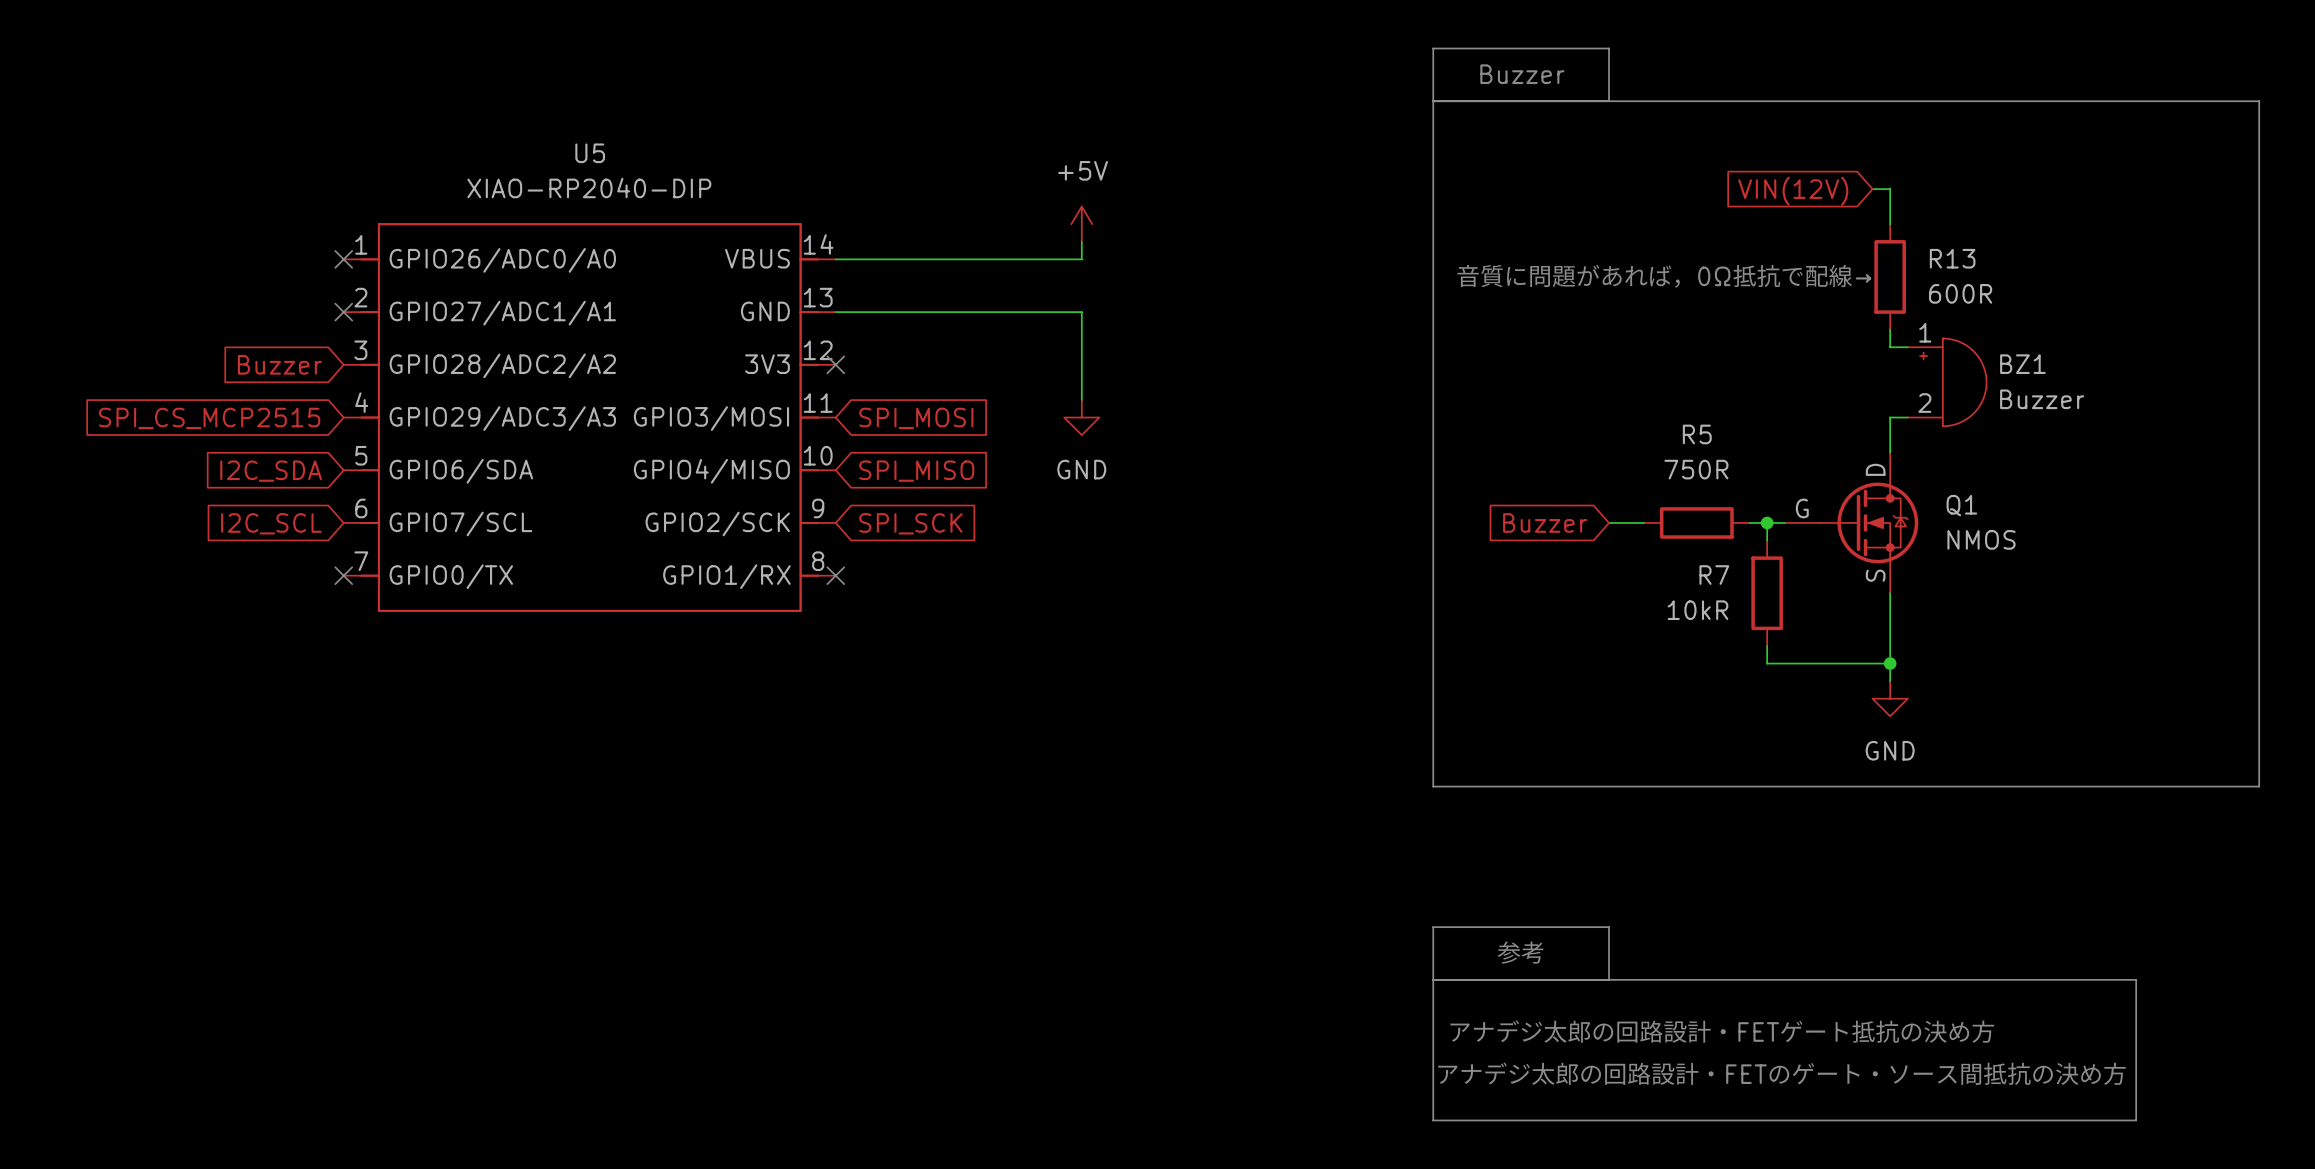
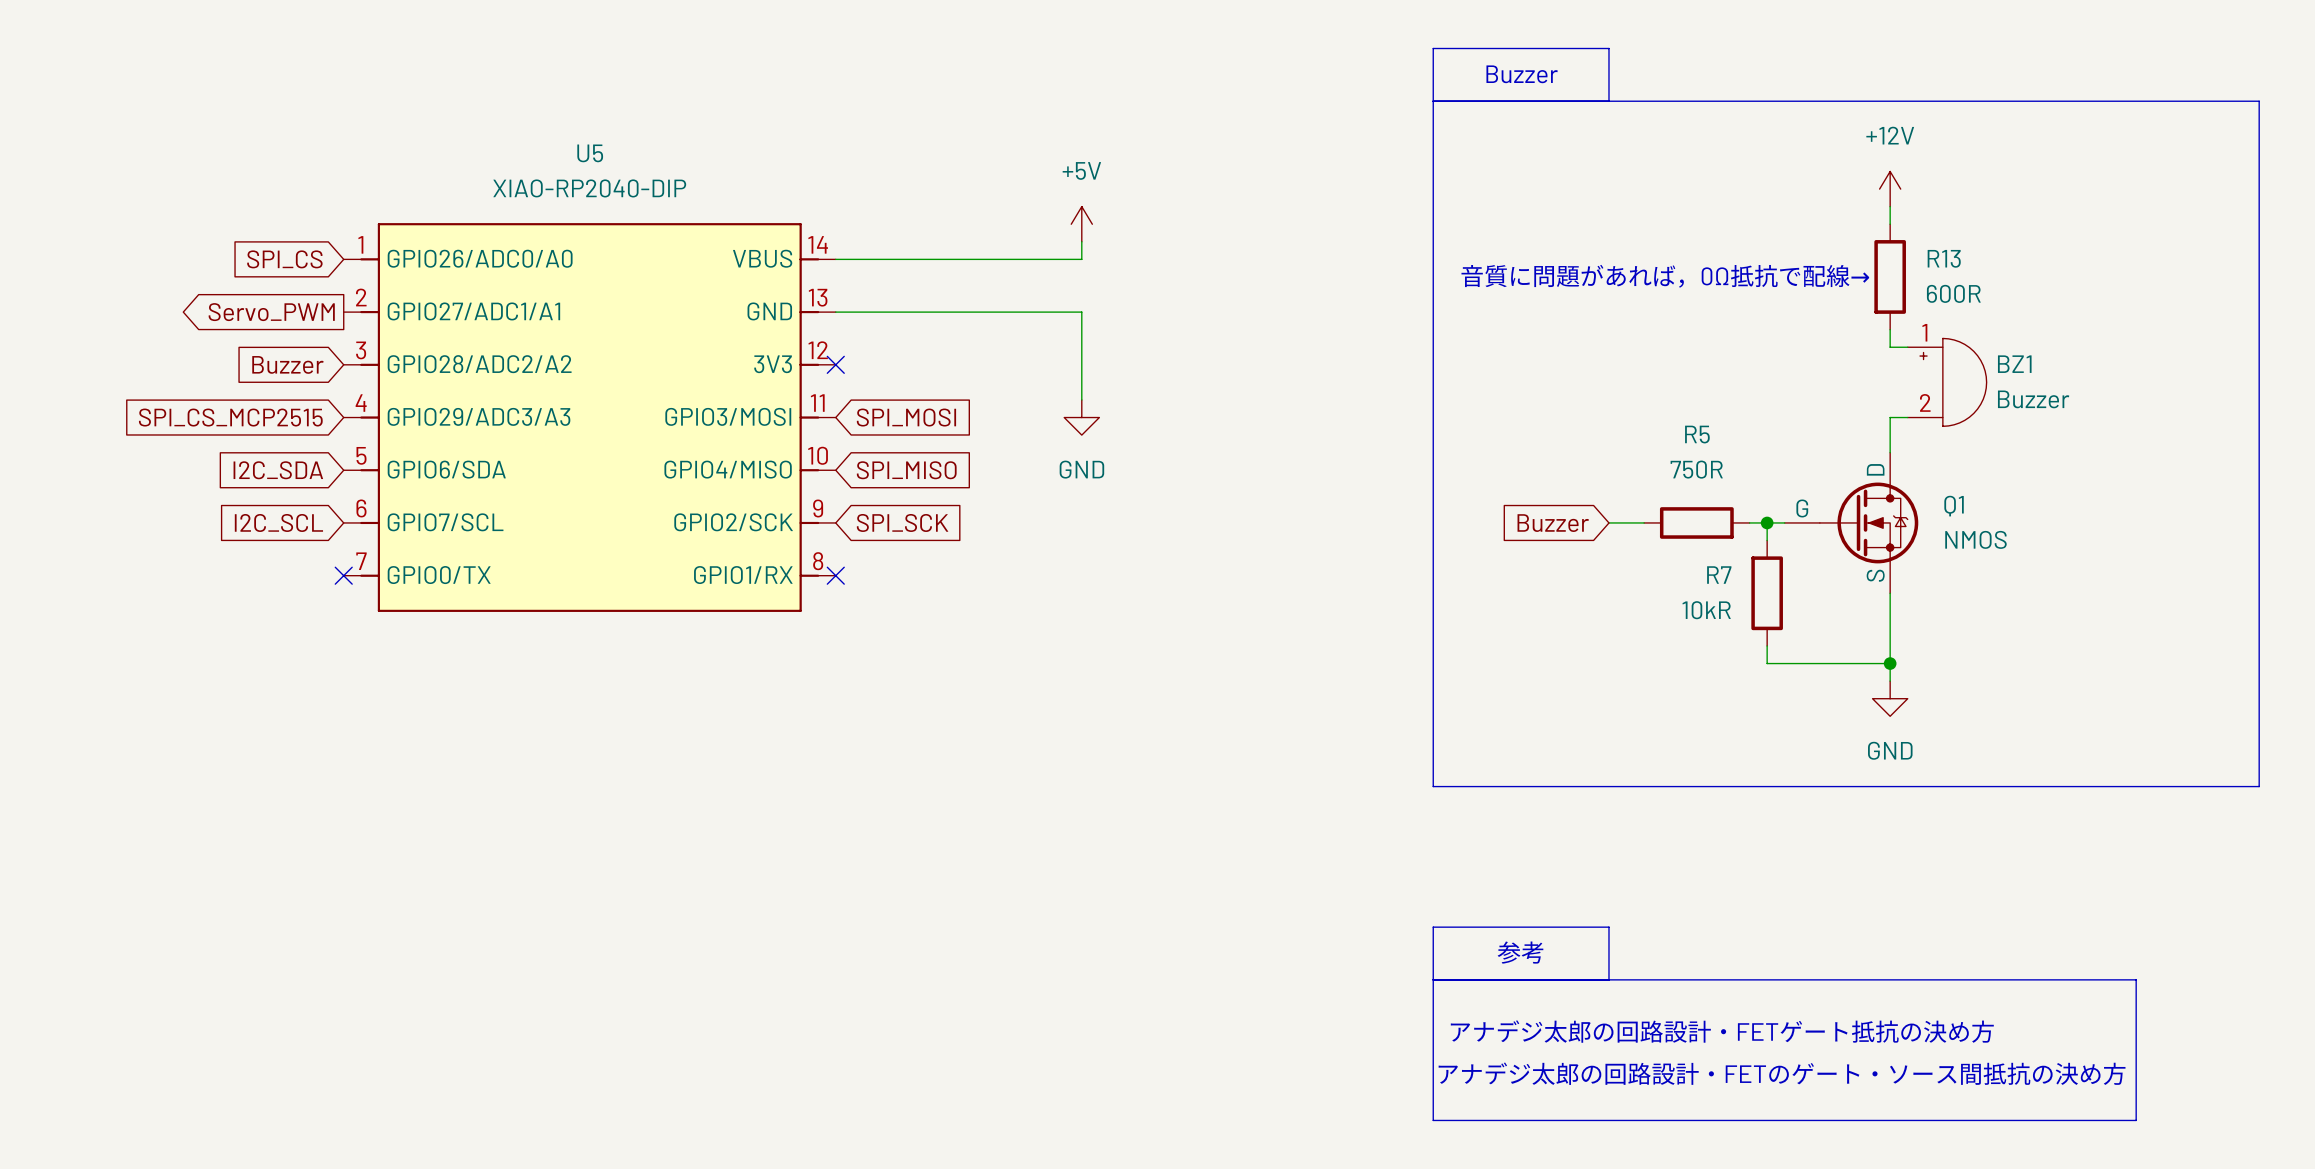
wire: (1872, 189) (1890, 189) (1890, 206) -> none
power symbol: none -> +12V (1890, 189)
global label: VIN(12V) (1793, 191) -> none
no-connect mark: (343, 259) -> none
global label: none -> SPI_CS (284, 259)
global label: none -> Servo_PWM (271, 312)
no-connect mark: (343, 312) -> none

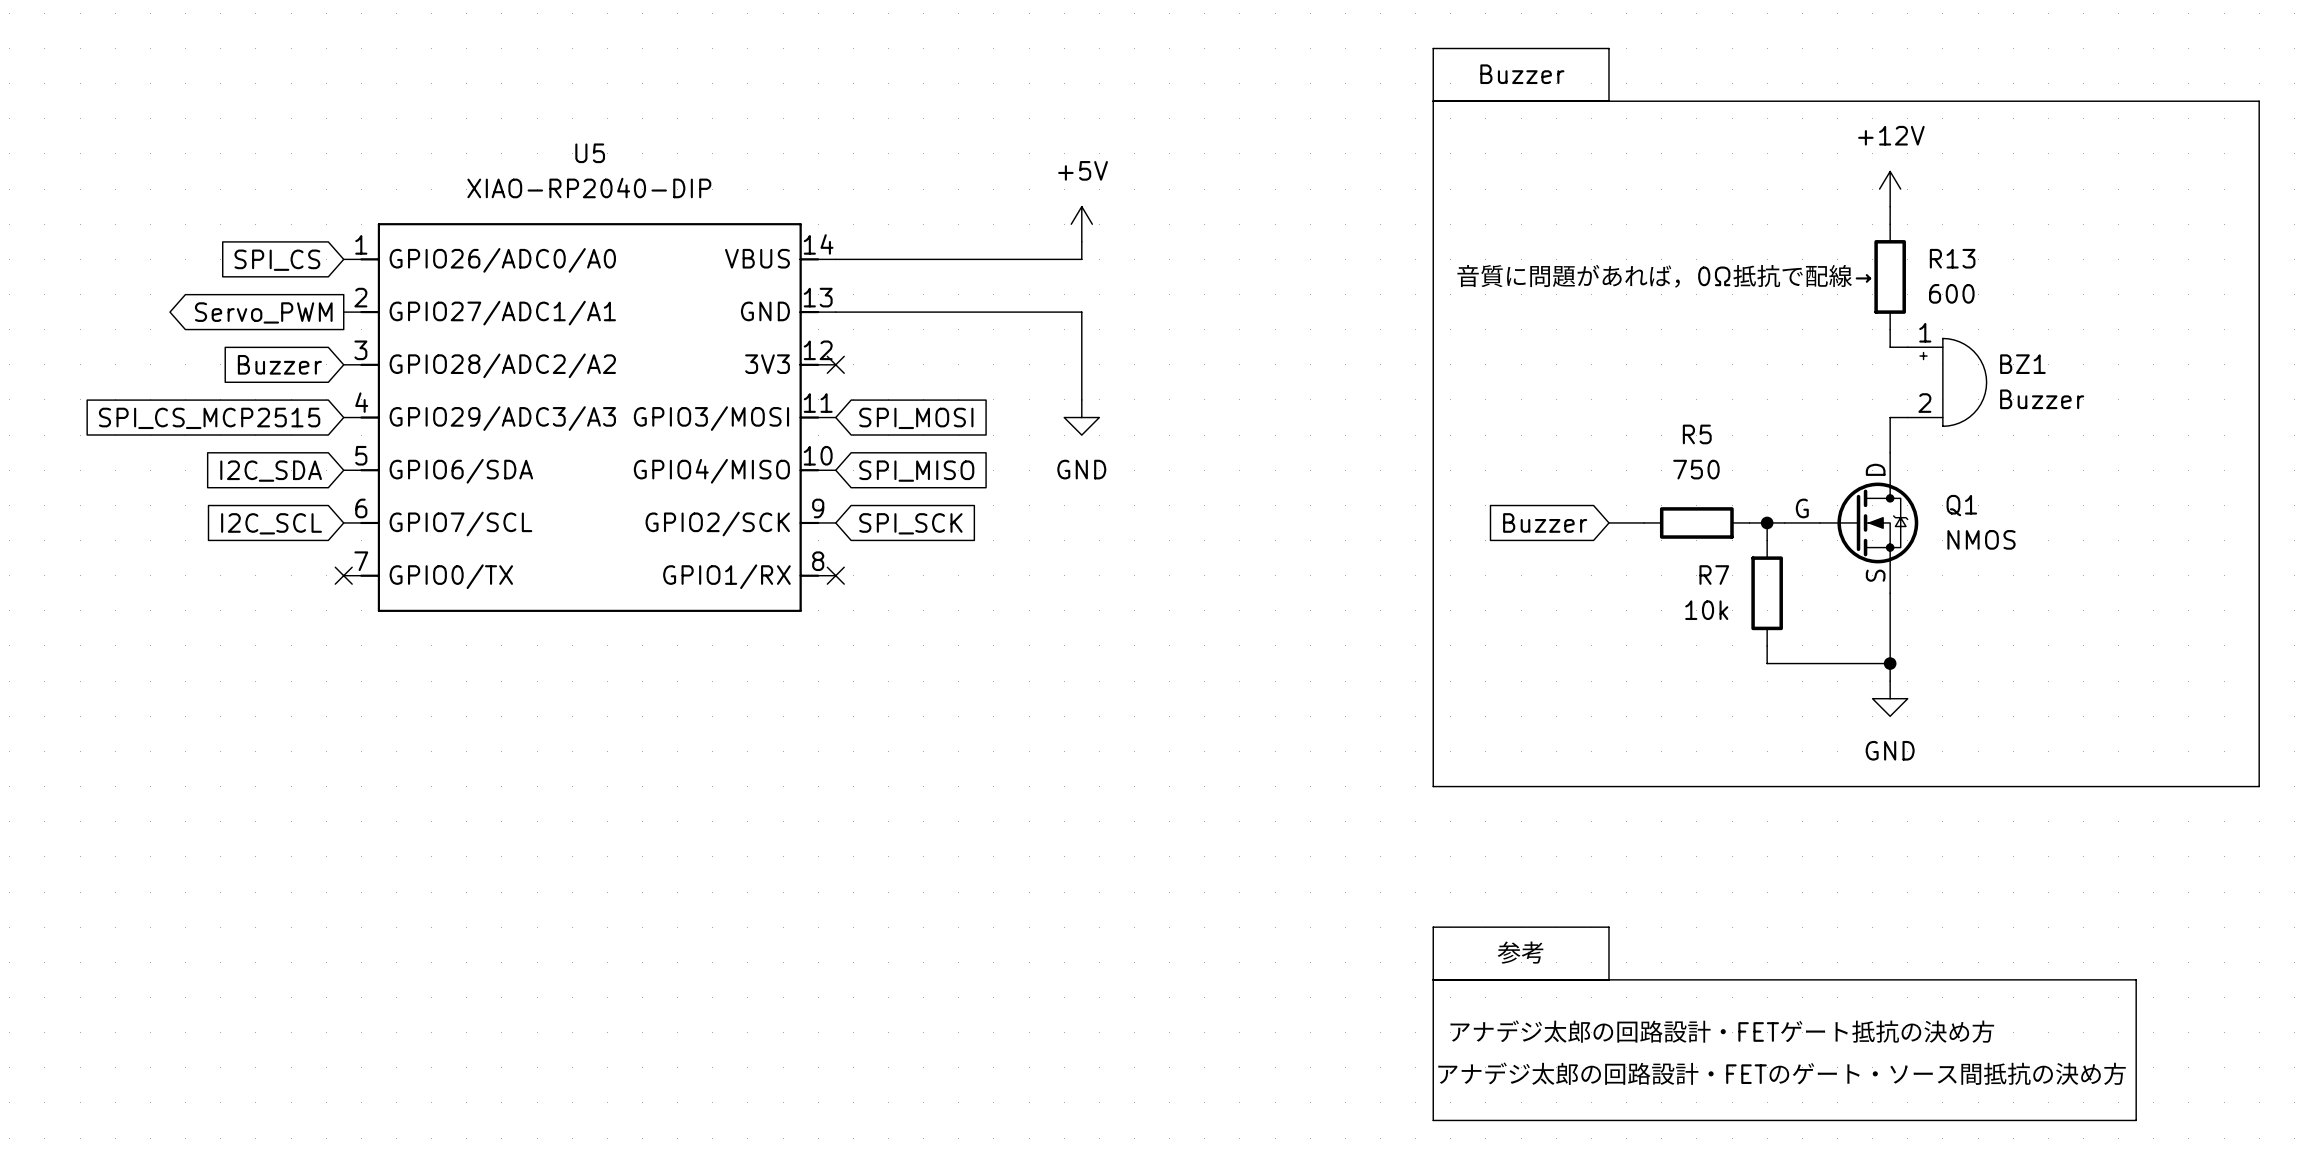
R13 value: 600R (1953, 293) -> 600 (1951, 293)
R5 value: 750R (1696, 469) -> 750 (1696, 469)
R7 value: 10kR (1706, 610) -> 10k (1706, 610)

